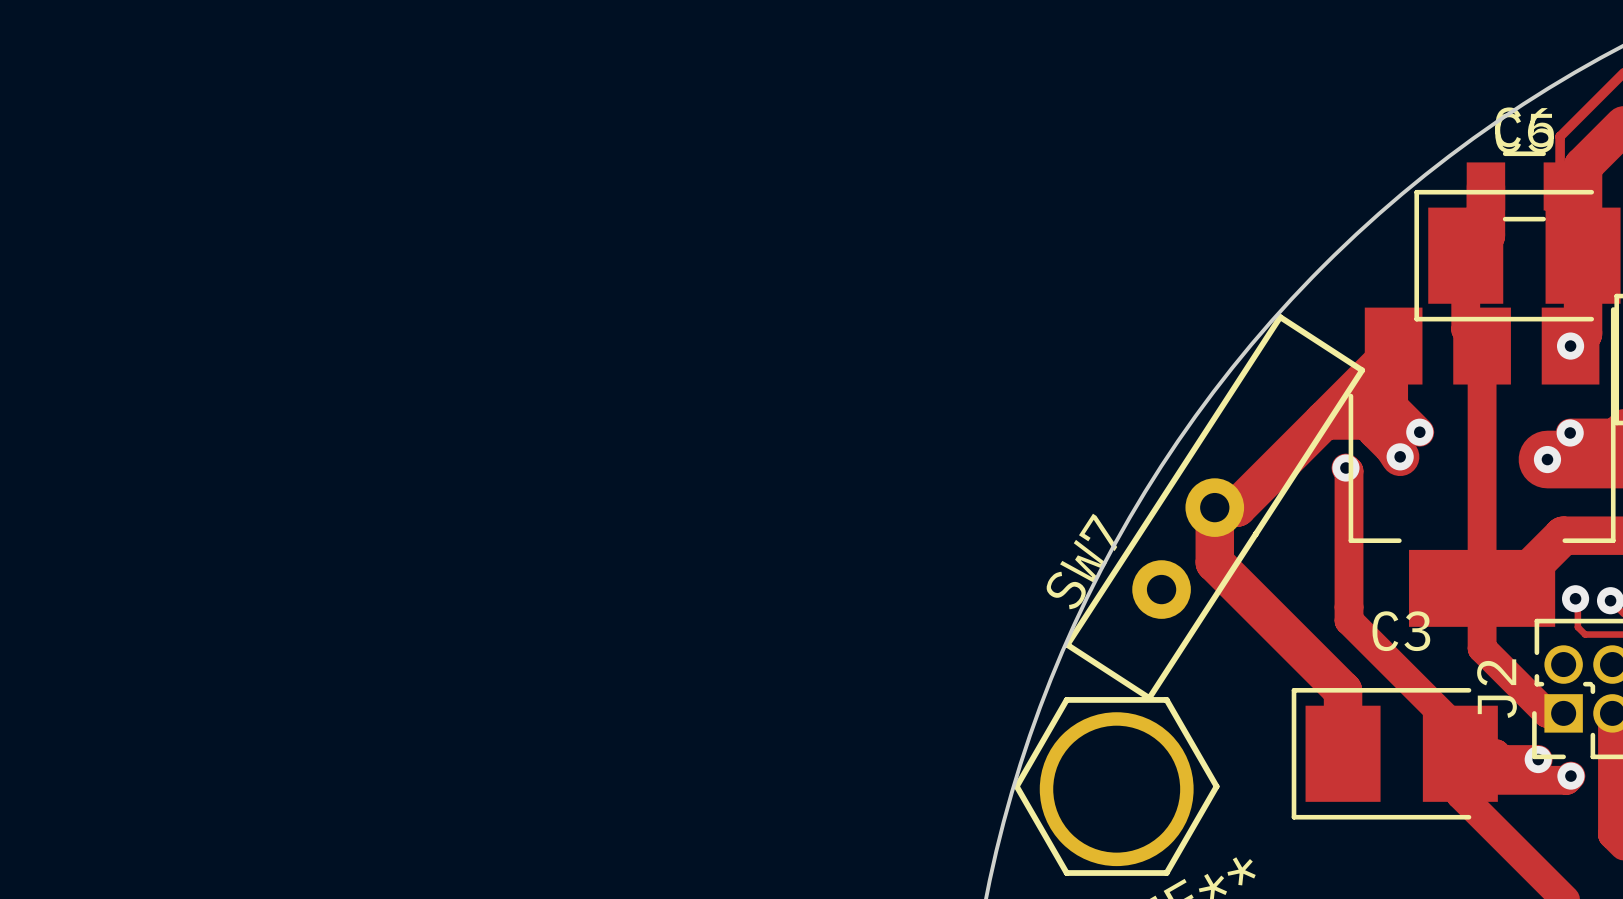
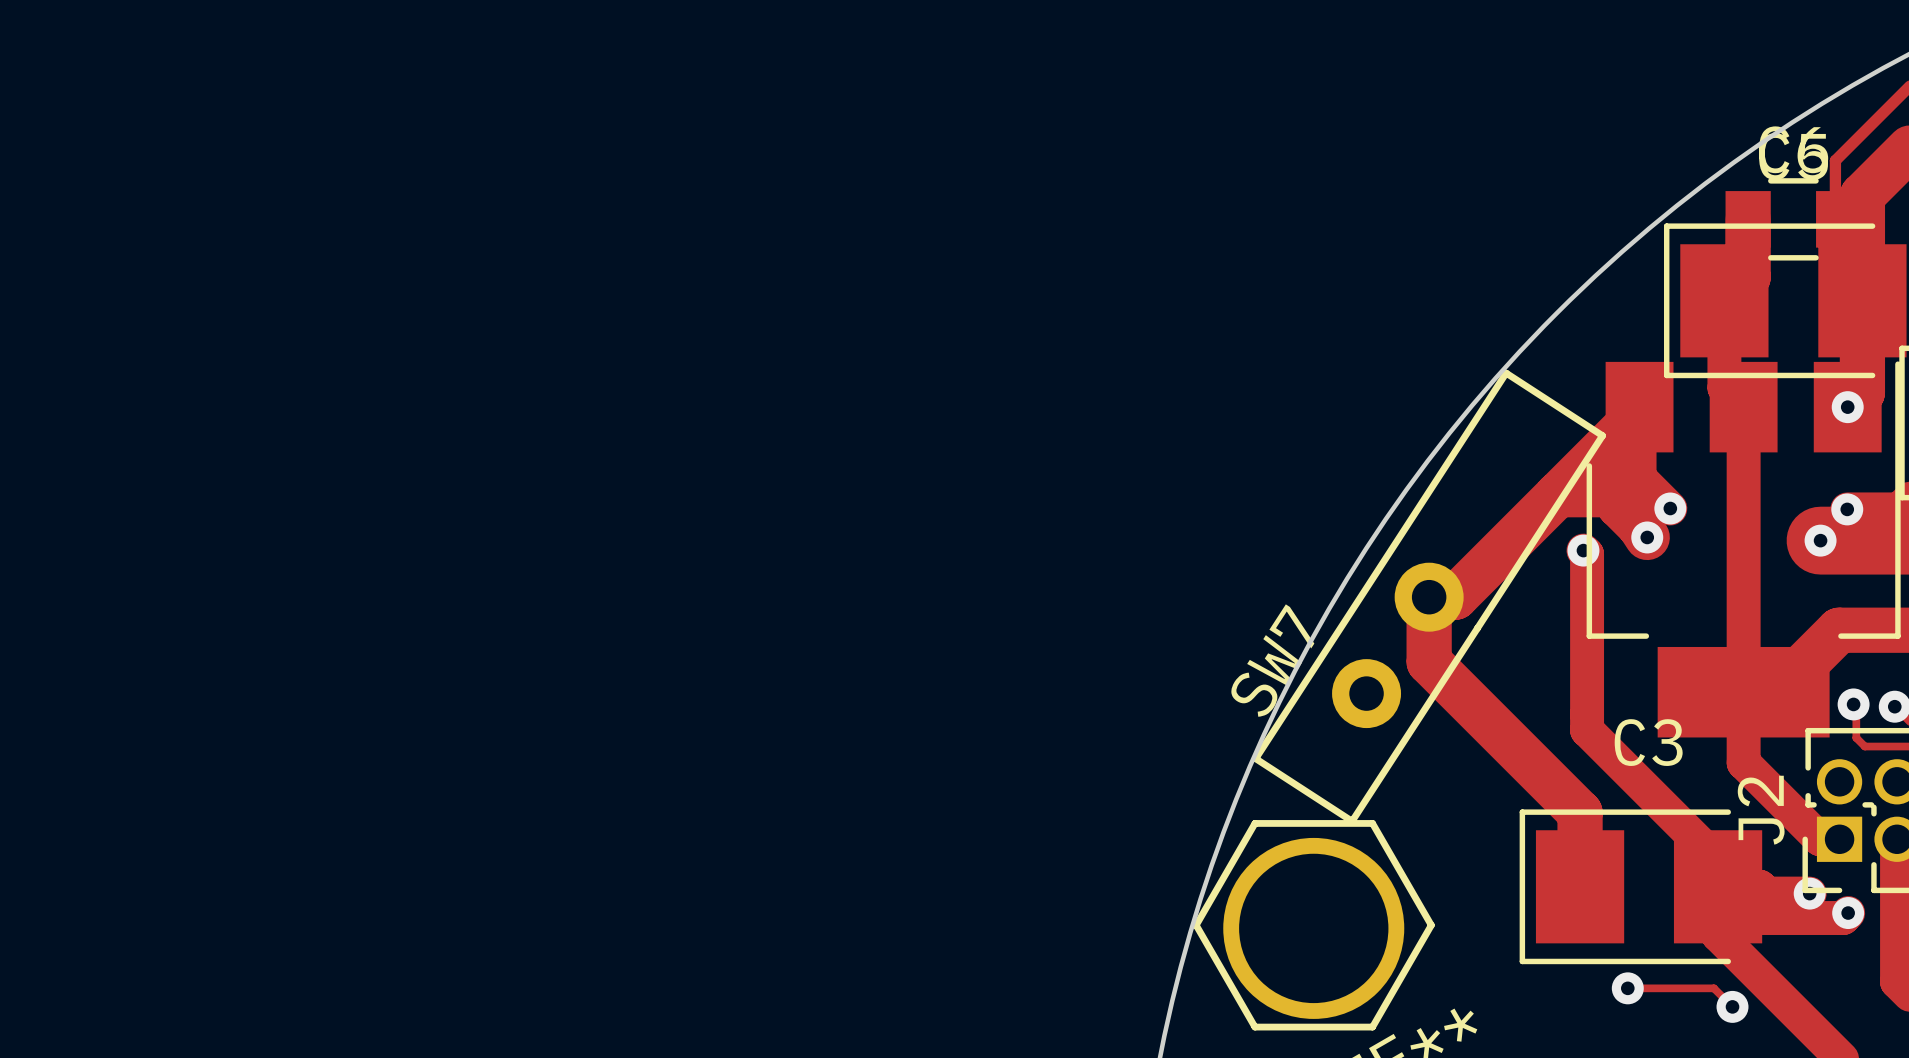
track: none -> (1627, 988) (1713, 988) (1732, 1006)
via: none -> (1627, 988)
via: none -> (1732, 1006)

